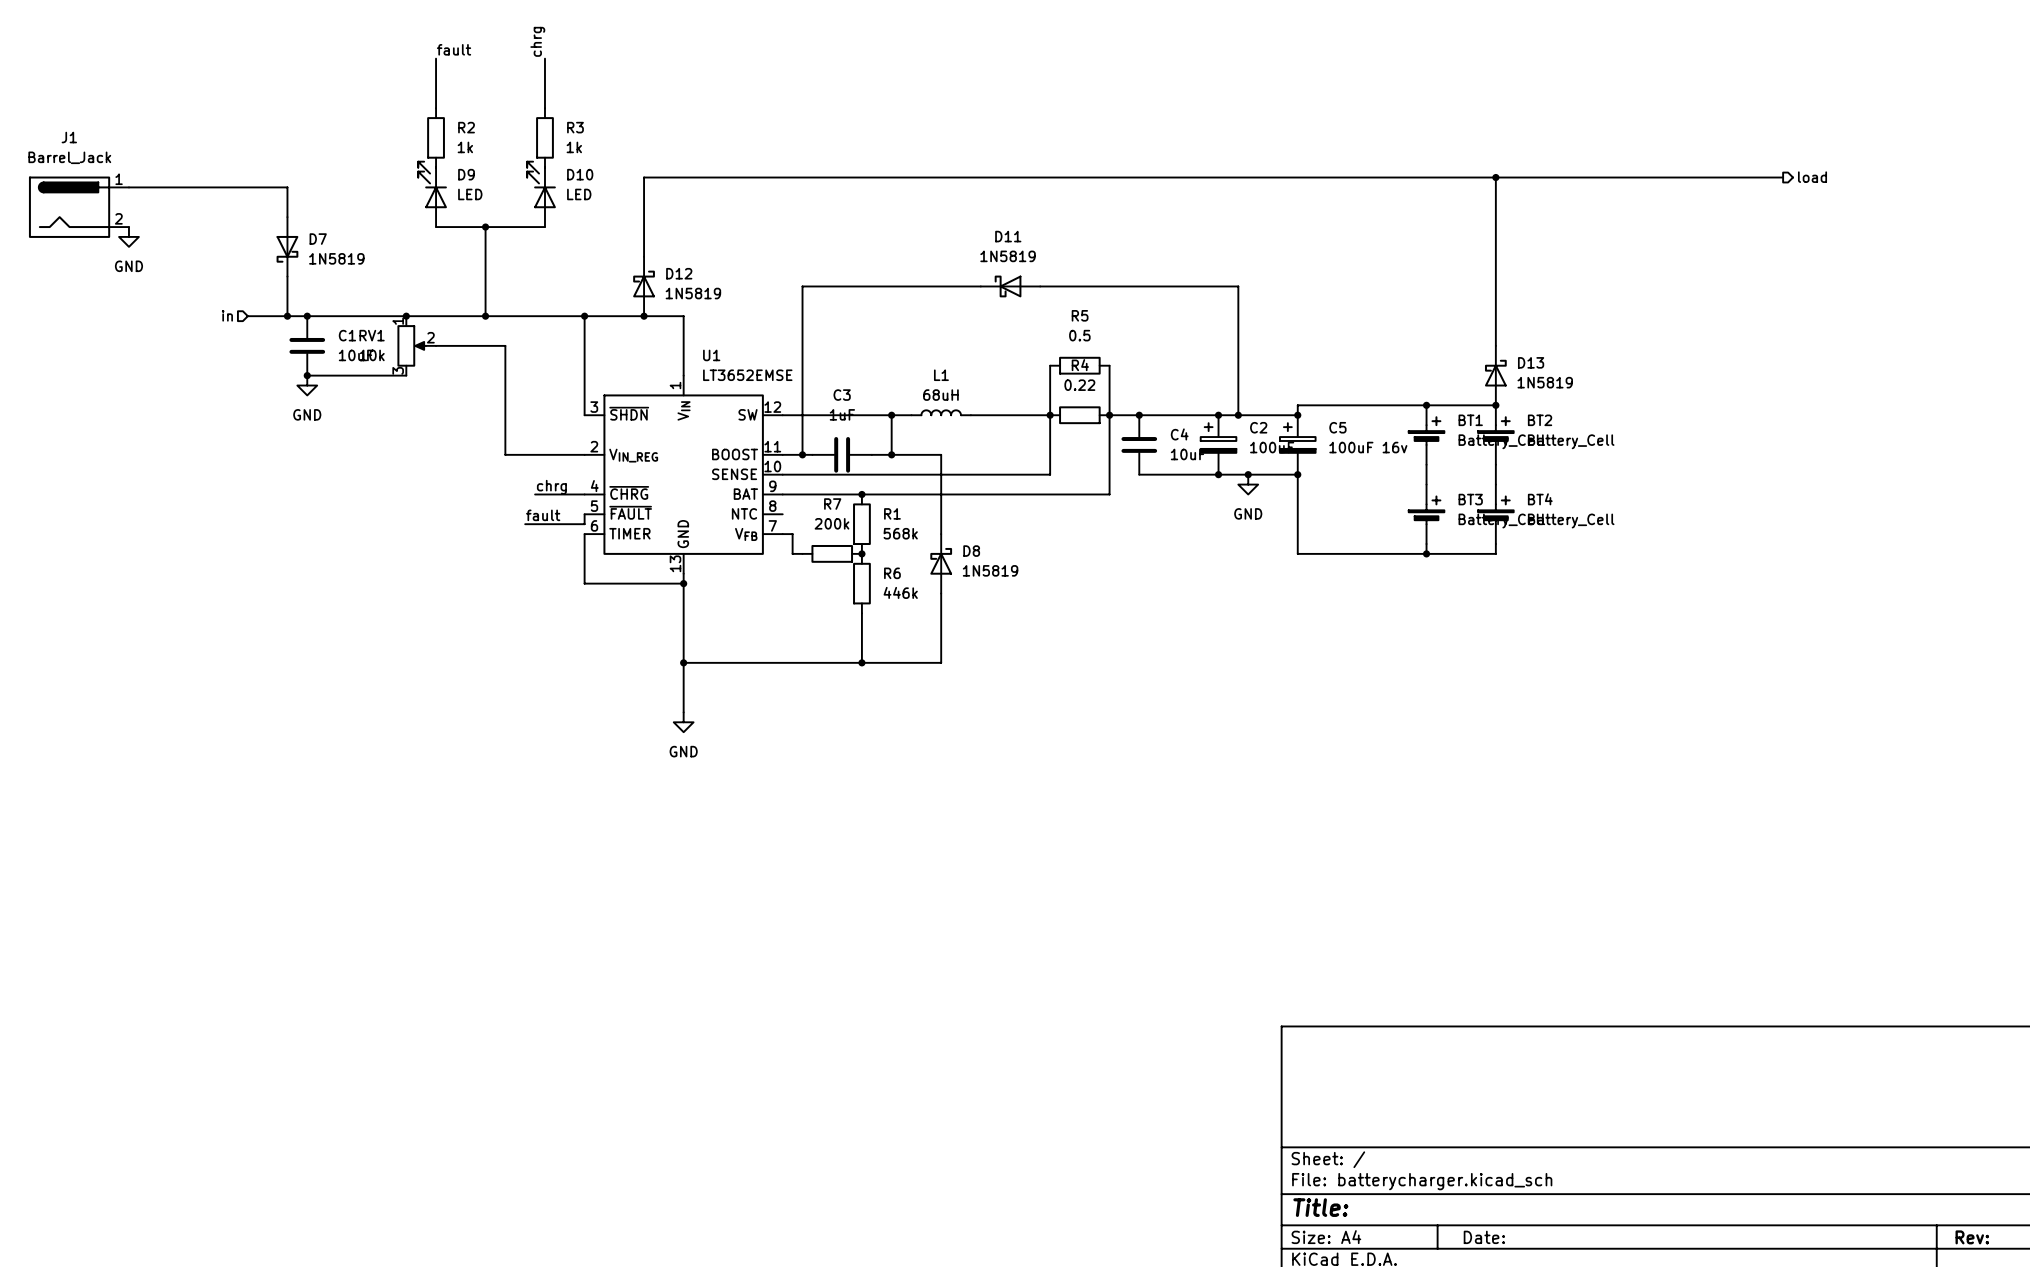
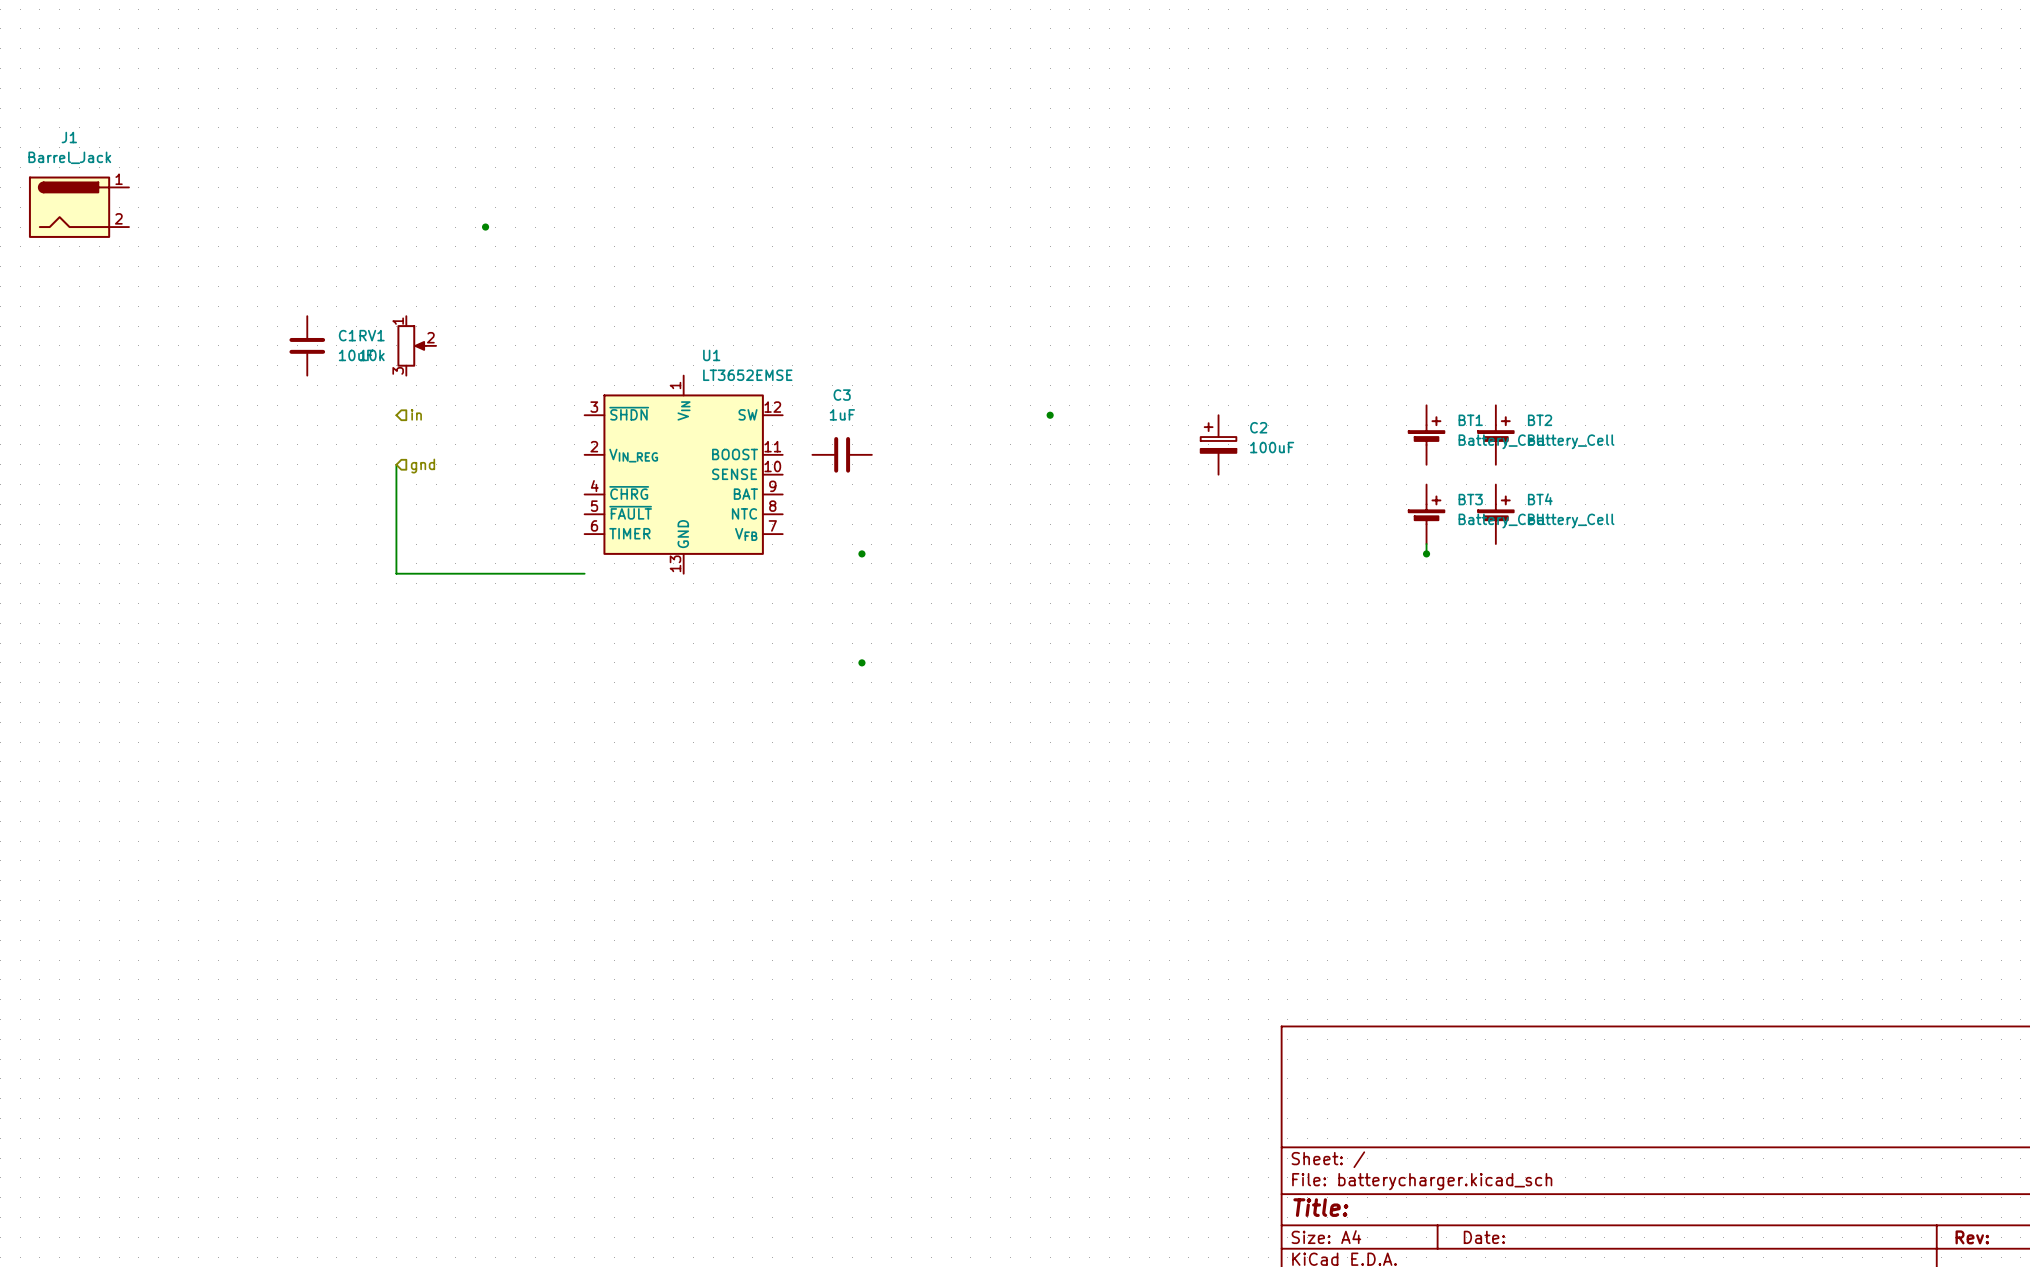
label: chrg (537, 41) -> none
label: fault (454, 49) -> none
wire: (436, 58) (436, 108) -> none
wire: (544, 58) (544, 108) -> none
R2: 1k (436, 137) -> none
R3: 1k (544, 137) -> none
wire: (1495, 177) (1495, 345) -> none
junction: (1495, 177) -> none
wire: (1783, 177) (644, 177) (644, 256) -> none
hierarchical label: load (1812, 177) -> none
wire: (128, 187) (287, 187) (287, 217) -> none
D9: LED (432, 194) -> none
D10: LED (541, 194) -> none
wire: (436, 227) (544, 227) -> none
wire: (485, 227) (485, 316) -> none
power symbol: GND (128, 236) -> none
D7: 1N5819 (287, 246) -> none
wire: (287, 276) (287, 316) -> none
D12: 1N5819 (644, 286) -> none
wire: (980, 286) (802, 286) (802, 454) -> none
D11: 1N5819 (1010, 286) -> none
wire: (1040, 286) (1238, 286) (1238, 415) -> none
hierarchical label: in (227, 315) -> none
wire: (247, 316) (683, 316) (683, 375) -> none
junction: (287, 316) -> none
junction: (307, 316) -> none
junction: (406, 316) -> none
junction: (485, 316) -> none
wire: (584, 316) (584, 415) -> none
junction: (584, 316) -> none
junction: (644, 316) -> none
wire: (436, 345) (505, 345) (505, 454) (584, 454) -> none
wire: (1050, 365) (1050, 474) (782, 474) -> none
R5: 0.5 (1079, 365) -> none
wire: (1109, 365) (1109, 494) (782, 494) -> none
wire: (307, 375) (406, 375) -> none
junction: (307, 375) -> none
D13: 1N5819 (1495, 375) -> none
power symbol: GND (307, 385) -> none
junction: (1426, 405) -> none
wire: (1495, 405) (1297, 405) (1297, 415) (1109, 415) -> none
junction: (1495, 405) -> none
L1: 68uH (941, 412) -> none
hierarchical label: none -> in (416, 414)
wire: (782, 415) (911, 415) -> none
wire: (891, 415) (891, 454) -> none
junction: (891, 415) -> none
wire: (970, 415) (1050, 415) -> none
R4: 0.22 (1079, 415) -> none
junction: (1109, 415) -> none
junction: (1139, 415) -> none
junction: (1218, 415) -> none
junction: (1238, 415) -> none
junction: (1297, 415) -> none
C4: 10uF (1139, 444) -> none
C5: 100uF 16v (1297, 444) -> none
wire: (782, 454) (812, 454) -> none
junction: (802, 454) -> none
wire: (871, 454) (941, 454) (941, 534) -> none
junction: (891, 454) -> none
wire: none -> (396, 464) (396, 573) (584, 573)
wire: (1426, 464) (1426, 484) -> none
wire: (1495, 464) (1495, 484) -> none
hierarchical label: none -> gnd (422, 466)
wire: (1139, 474) (1297, 474) (1297, 553) (1495, 553) (1495, 544) -> none
junction: (1218, 474) -> none
junction: (1248, 474) -> none
junction: (1297, 474) -> none
power symbol: GND (1248, 484) -> none
label: chrg (551, 487) -> none
wire: (535, 494) (584, 494) -> none
junction: (861, 494) -> none
wire: (584, 514) (584, 524) (525, 524) -> none
label: fault (543, 515) -> none
R1: 568k (861, 524) -> none
wire: (584, 534) (584, 583) (683, 583) -> none
wire: (782, 534) (792, 534) (792, 553) (802, 553) -> none
R7: 200k (832, 553) -> none
D8: 1N5819 (941, 563) -> none
wire: (683, 573) (683, 712) -> none
junction: (683, 583) -> none
R6: 446k (861, 583) -> none
wire: (941, 593) (941, 662) (683, 662) -> none
wire: (861, 613) (861, 662) -> none
junction: (683, 662) -> none
power symbol: GND (683, 722) -> none

